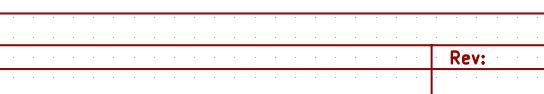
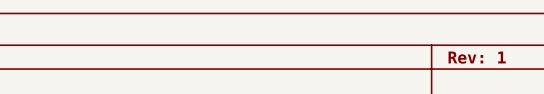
title block: Rev: (467, 57) -> Rev: 1 (477, 57)

